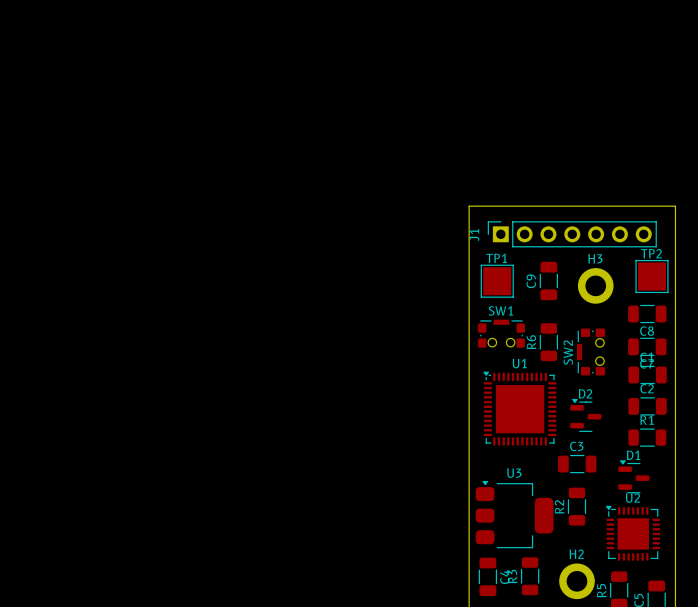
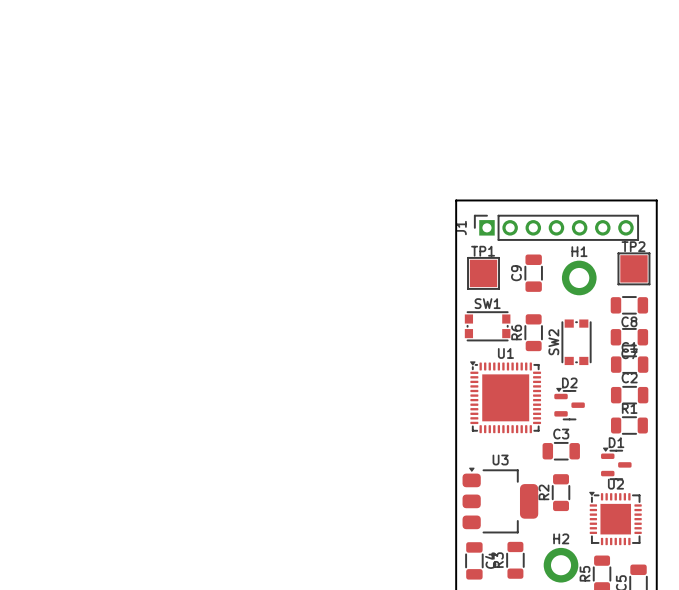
H3 name: H3 (595, 258) -> H1 (579, 251)
SW1 footprint: [478, 319, 525, 348] -> [464, 311, 511, 341]
SW2 footprint: [576, 328, 606, 376] -> [561, 319, 592, 366]

